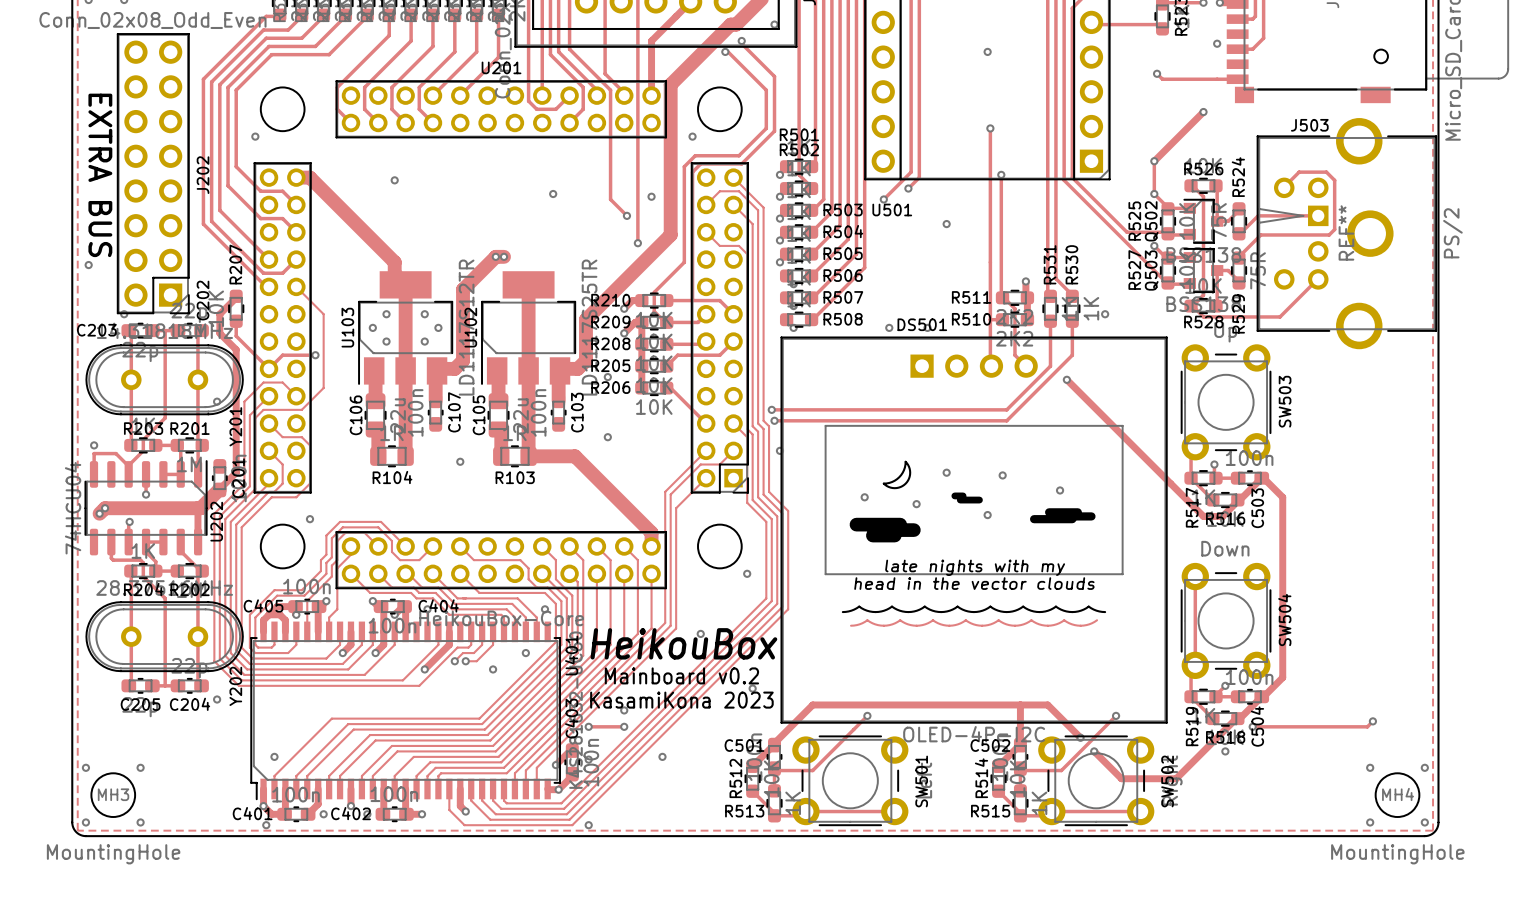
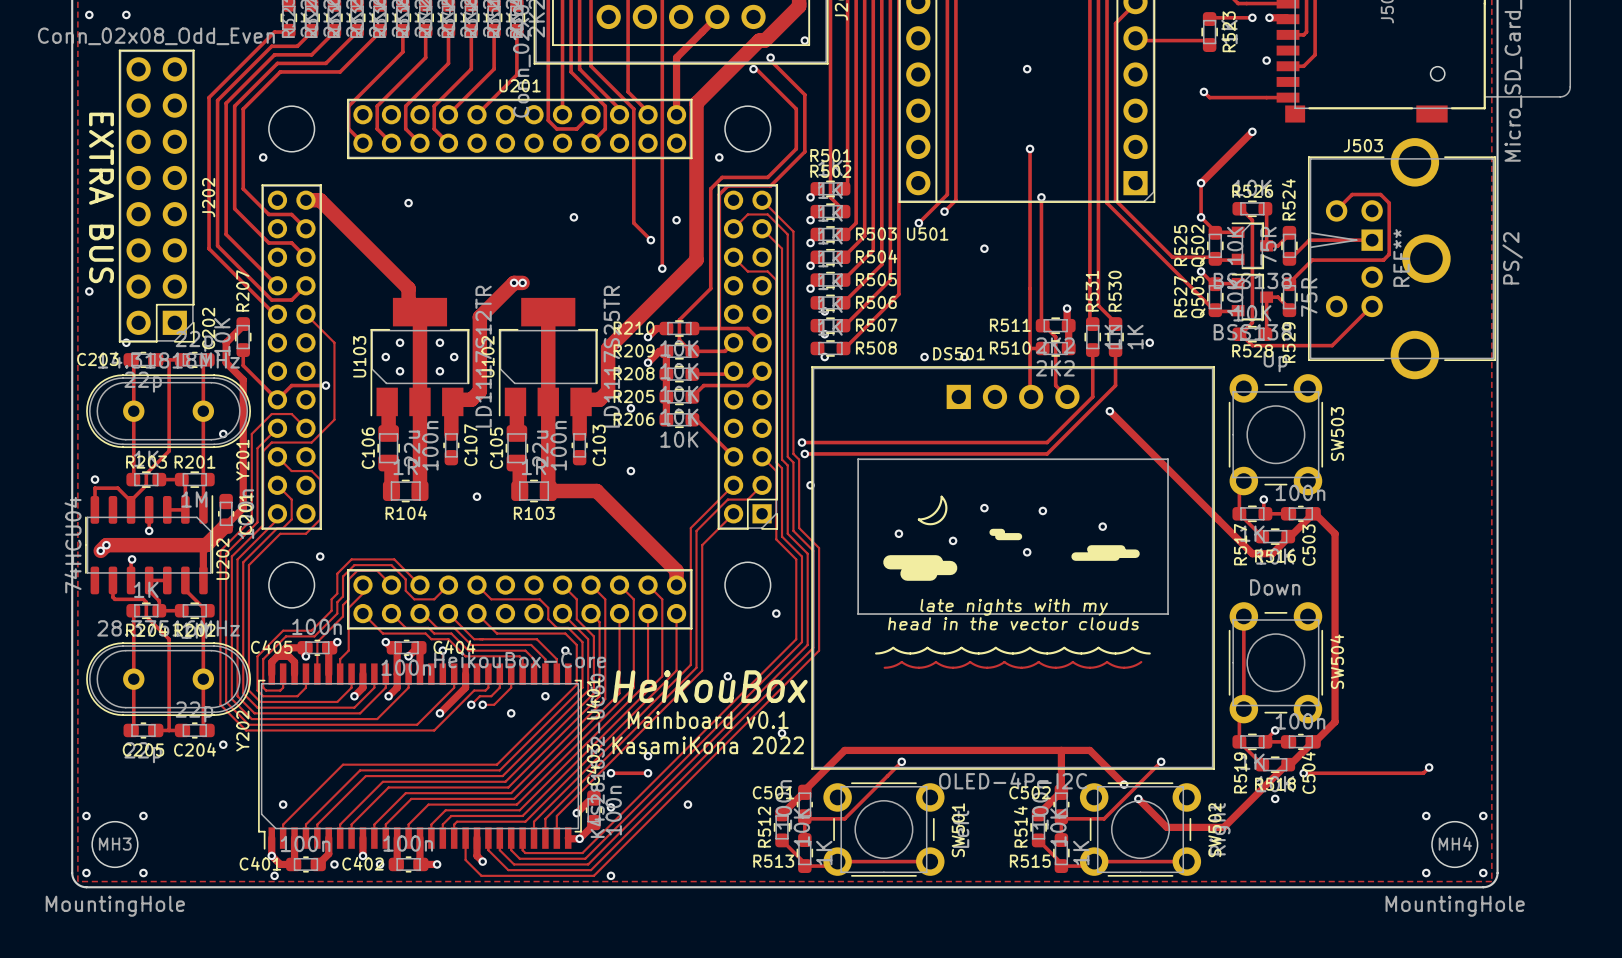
text: Mainboard v0.2 (681, 675) -> Mainboard v0.1 (708, 720)
text: KasamiKona 2023 (681, 700) -> KasamiKona 2022 (708, 745)

